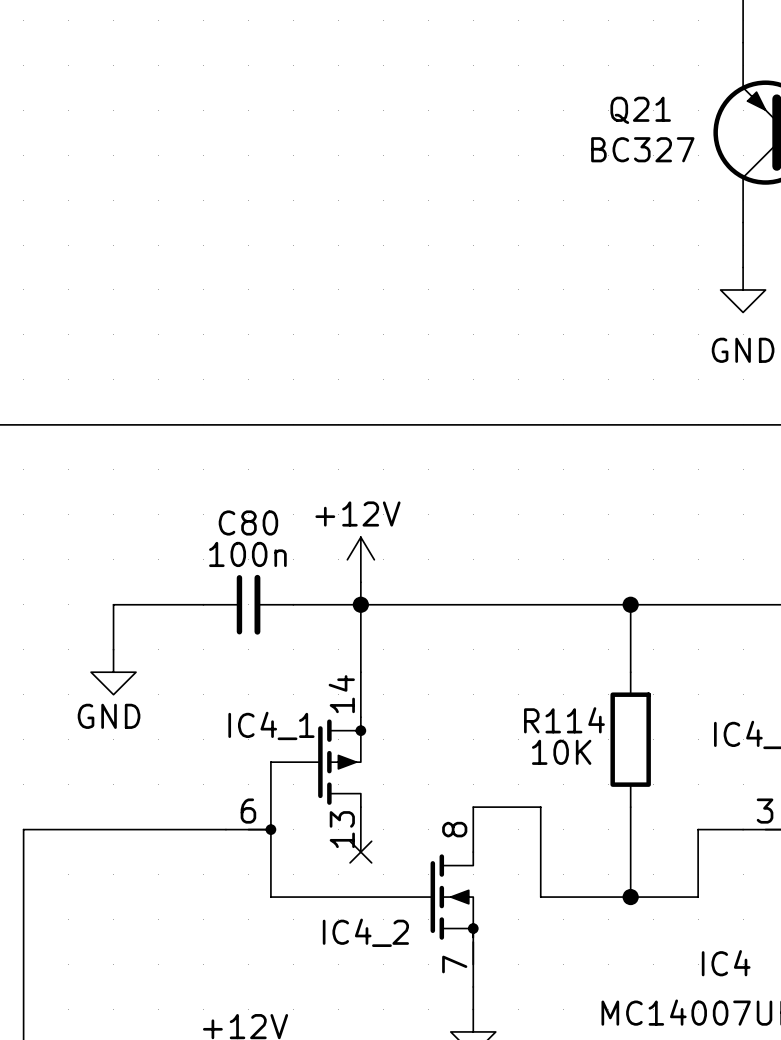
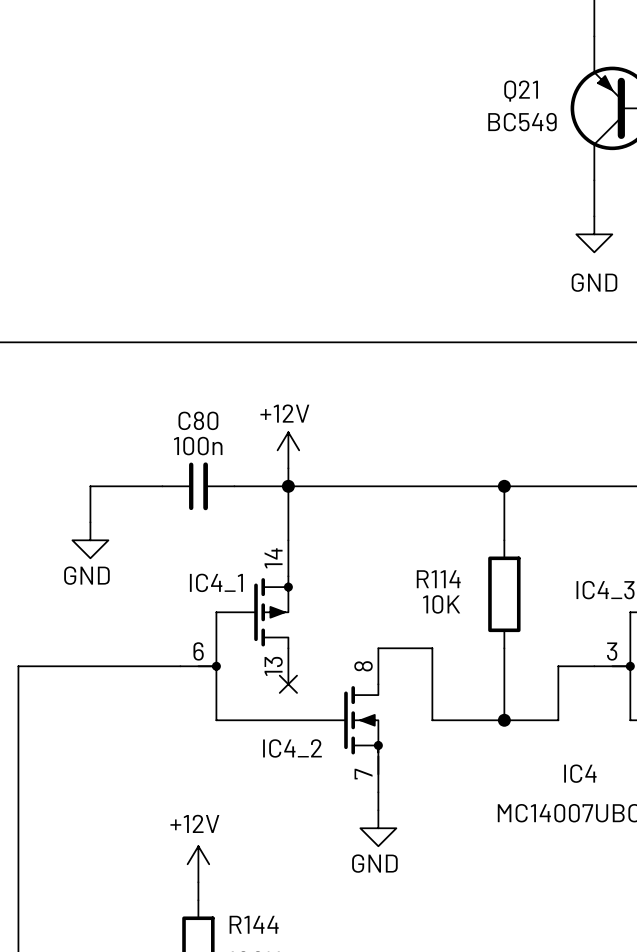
Q21 value: BC327 (642, 149) -> BC549 (522, 122)

